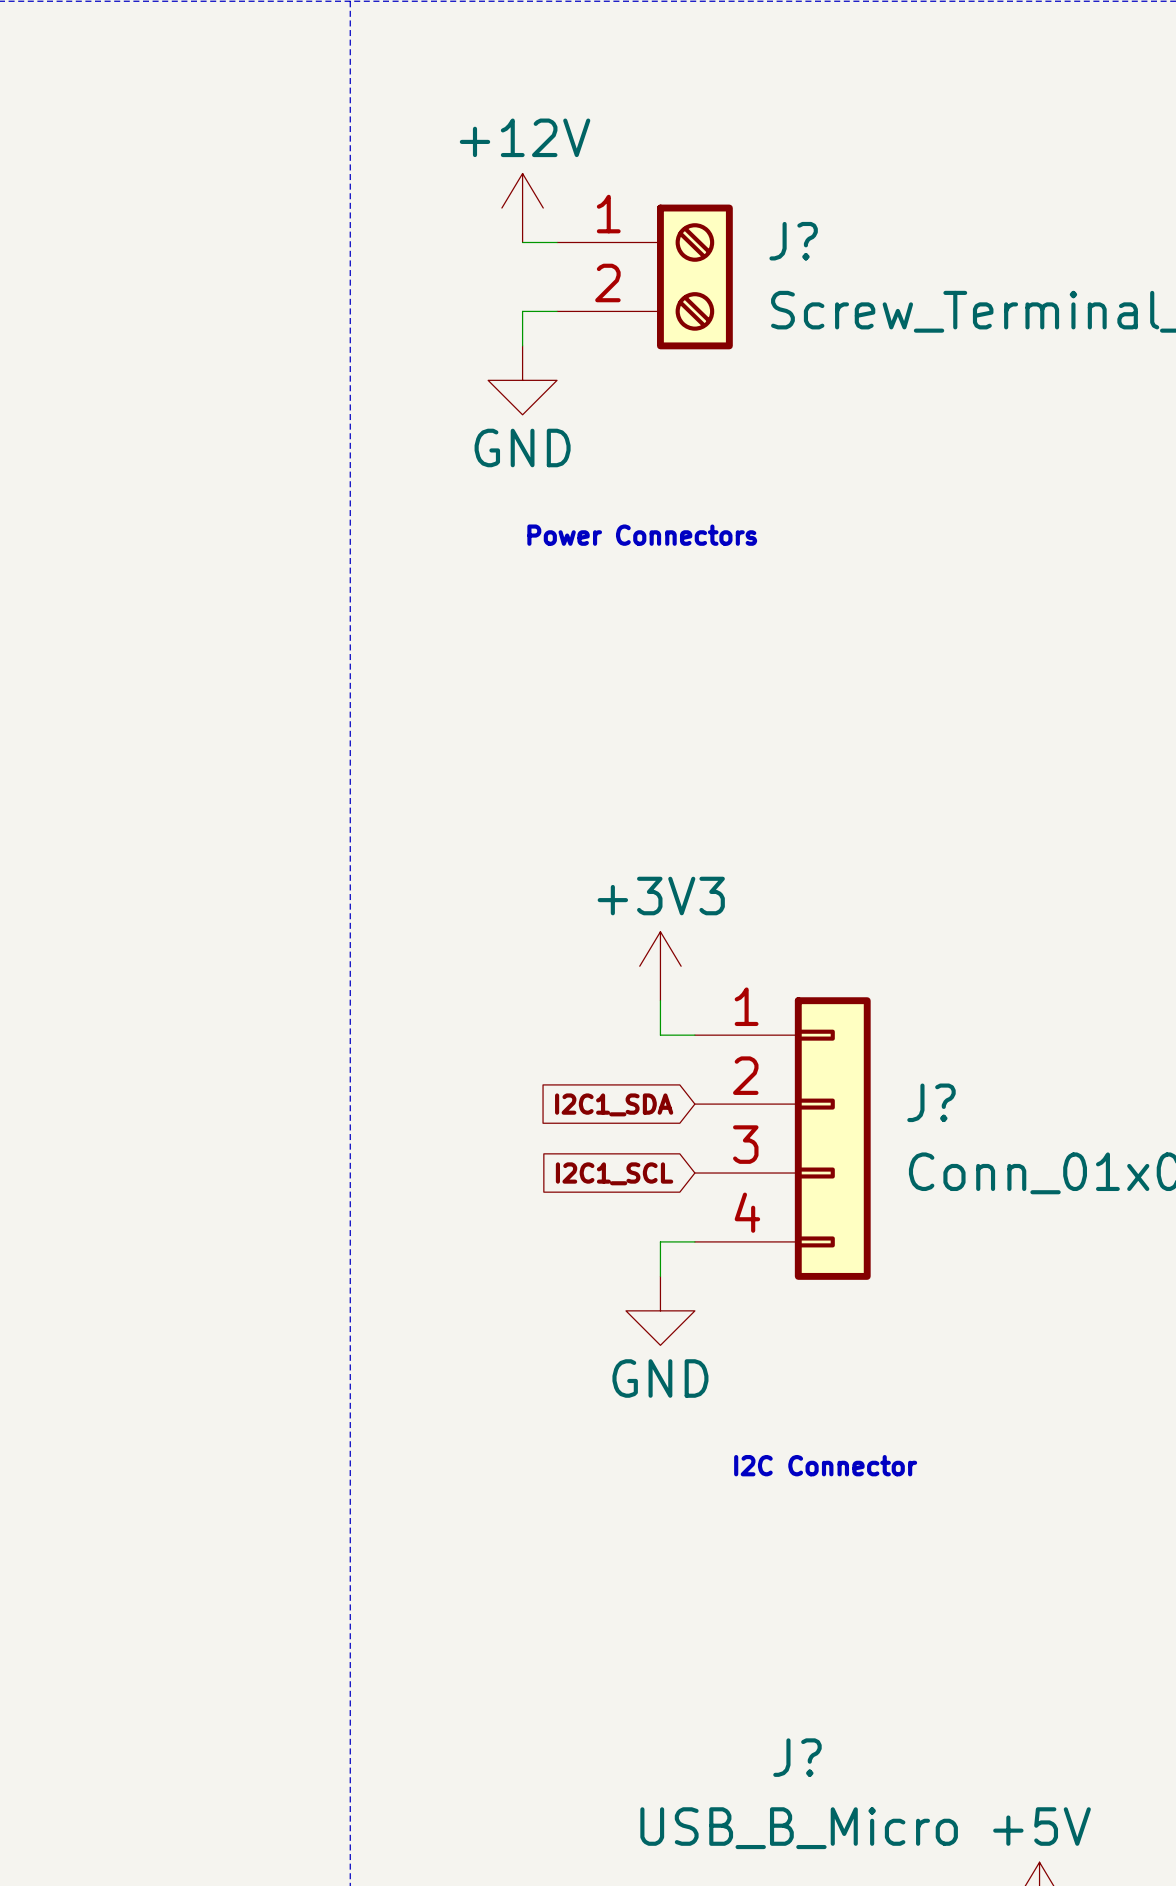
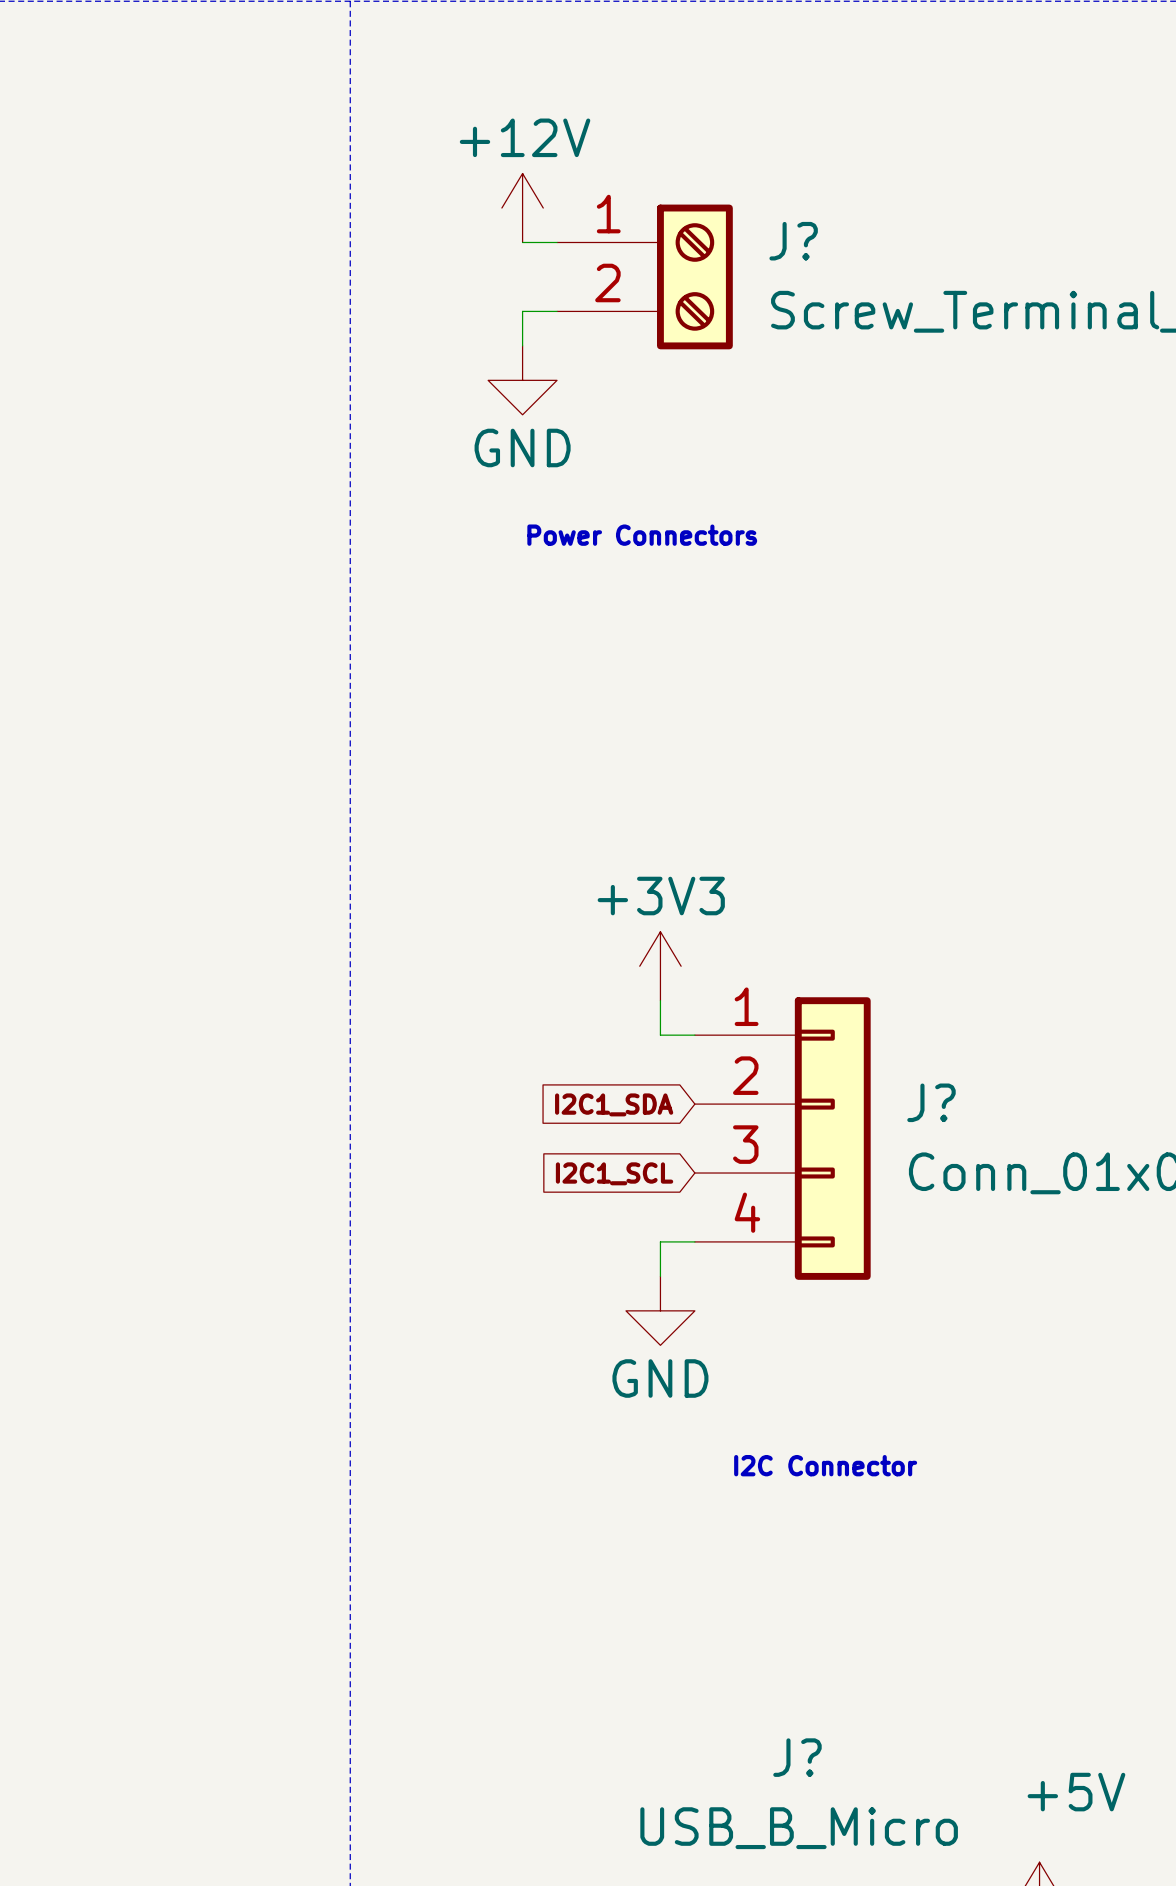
power symbol text position: +5V (1042, 1826) -> +5V (1076, 1792)

